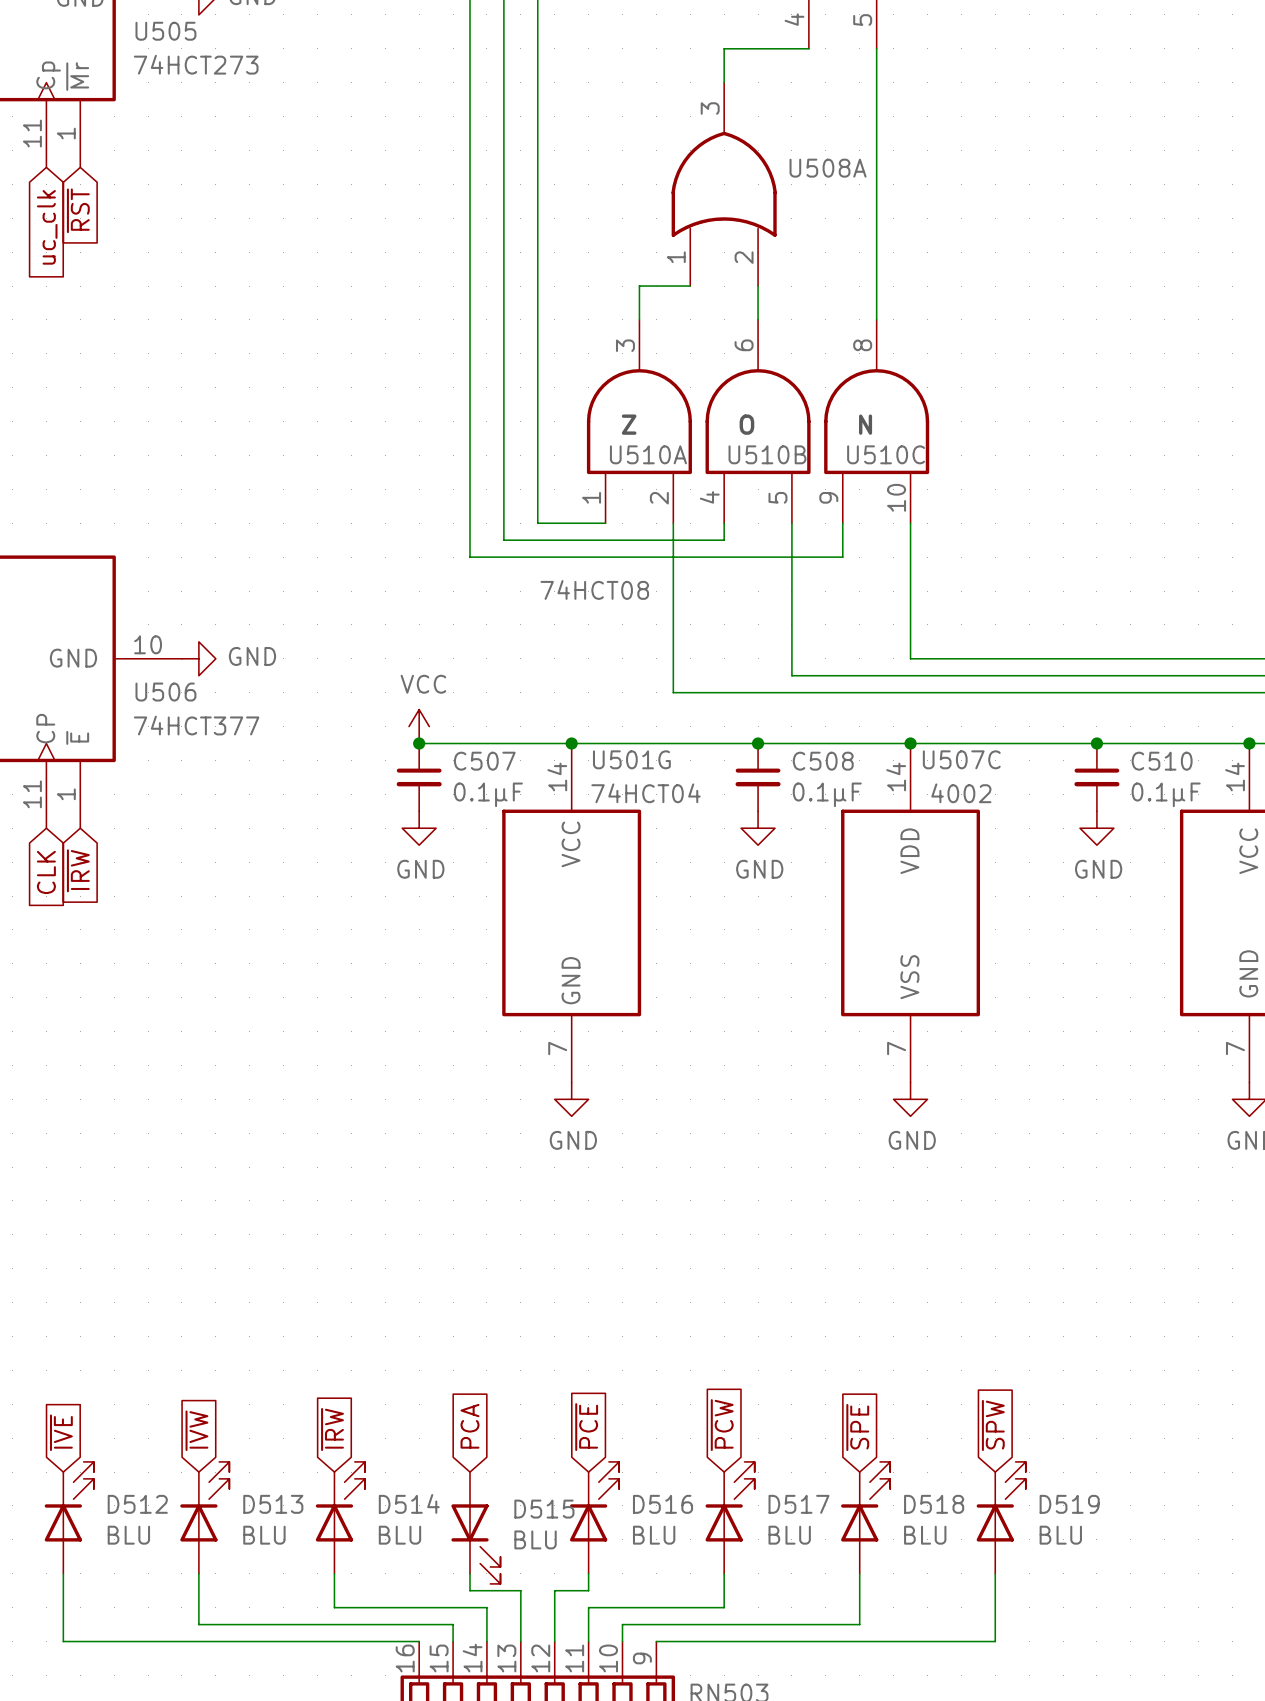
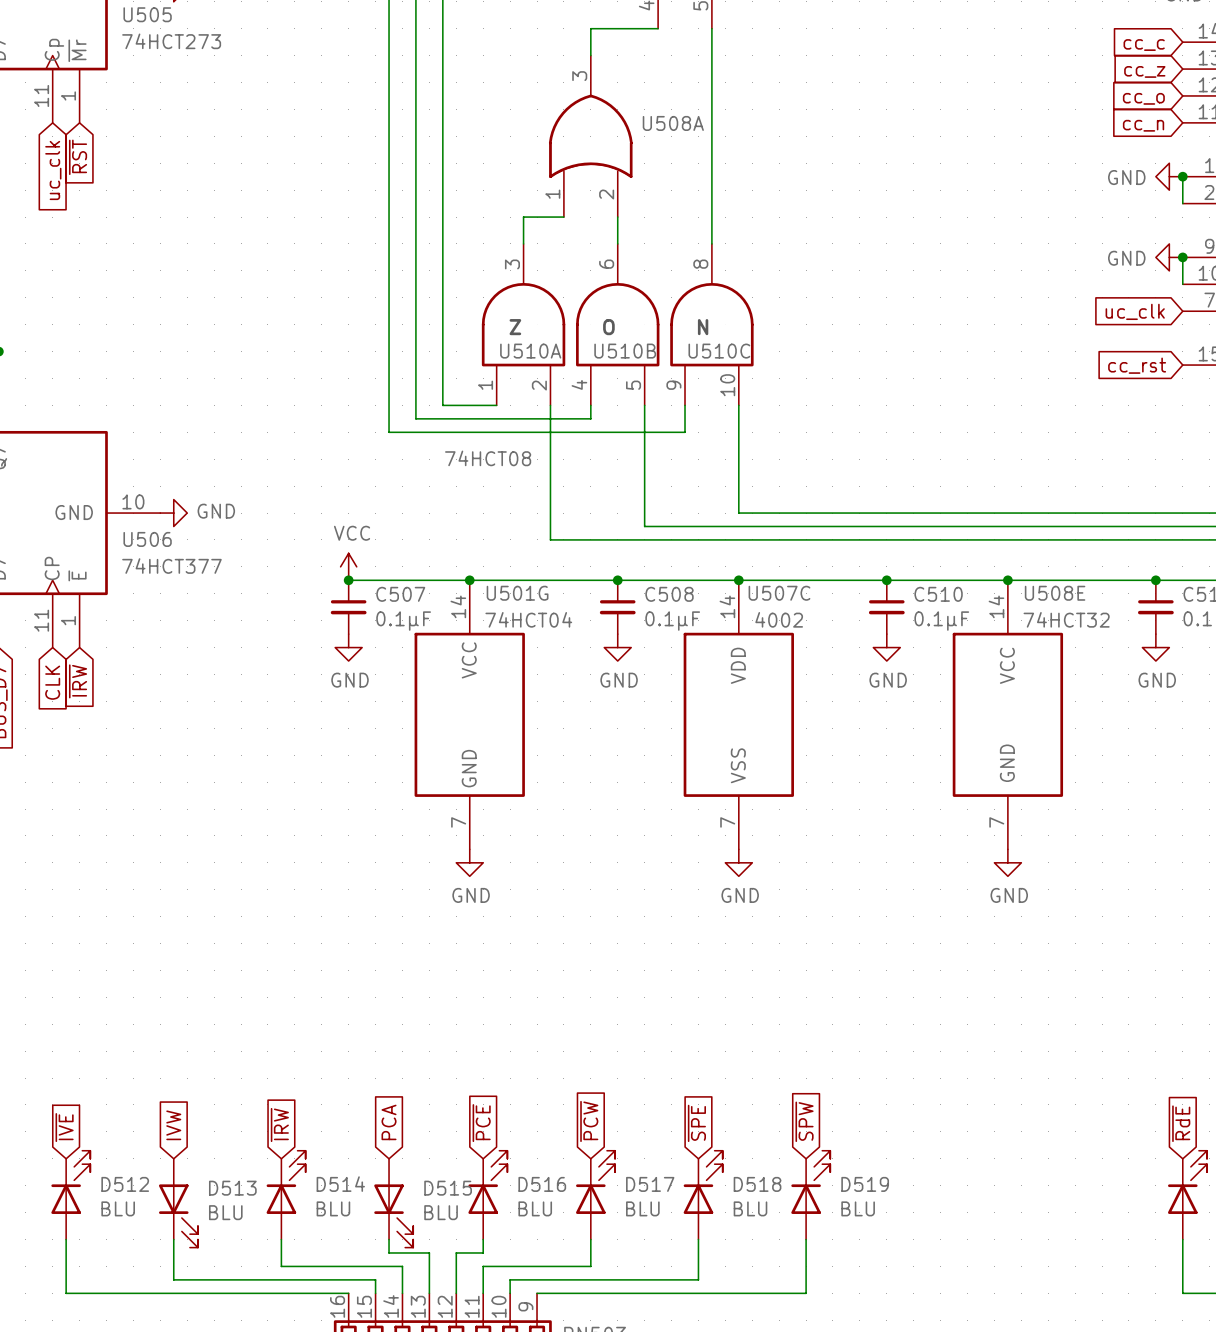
global label: ~{IVW} (196, 1430) -> IVW (173, 1125)
D513 flip: as is (204, 1501) -> up-down (178, 1215)

